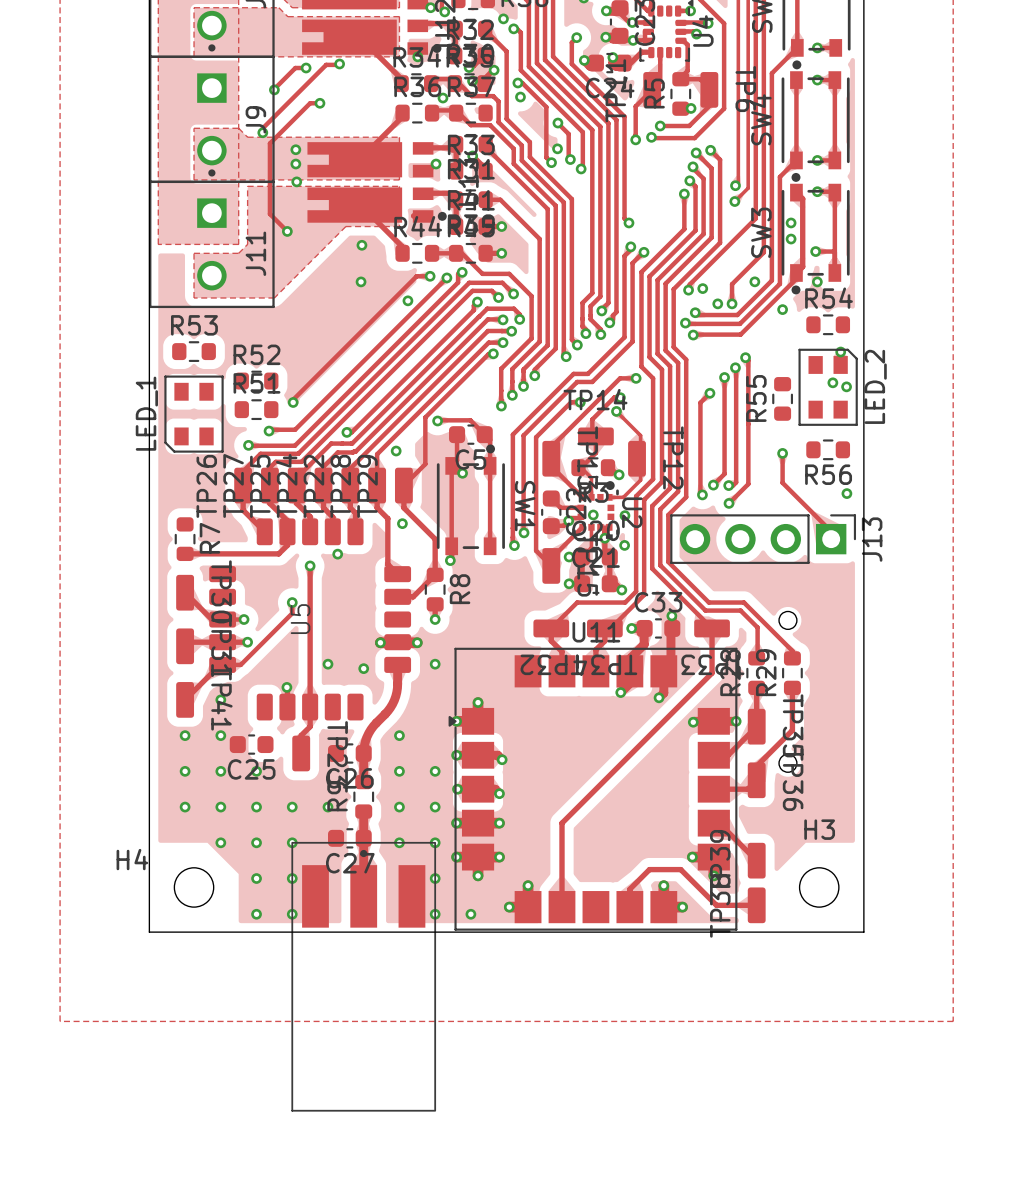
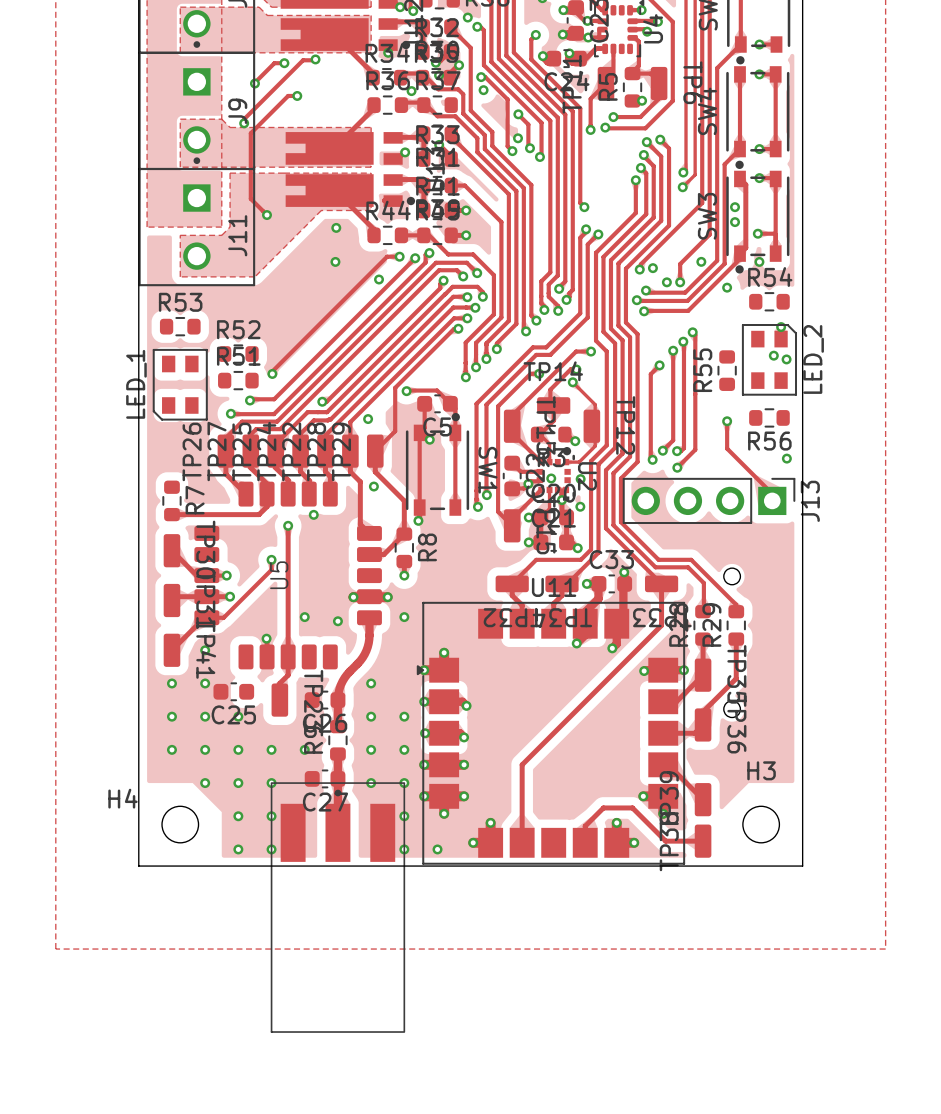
via: (295, 149) -> none
via: (295, 164) -> none
via: (296, 181) -> none

